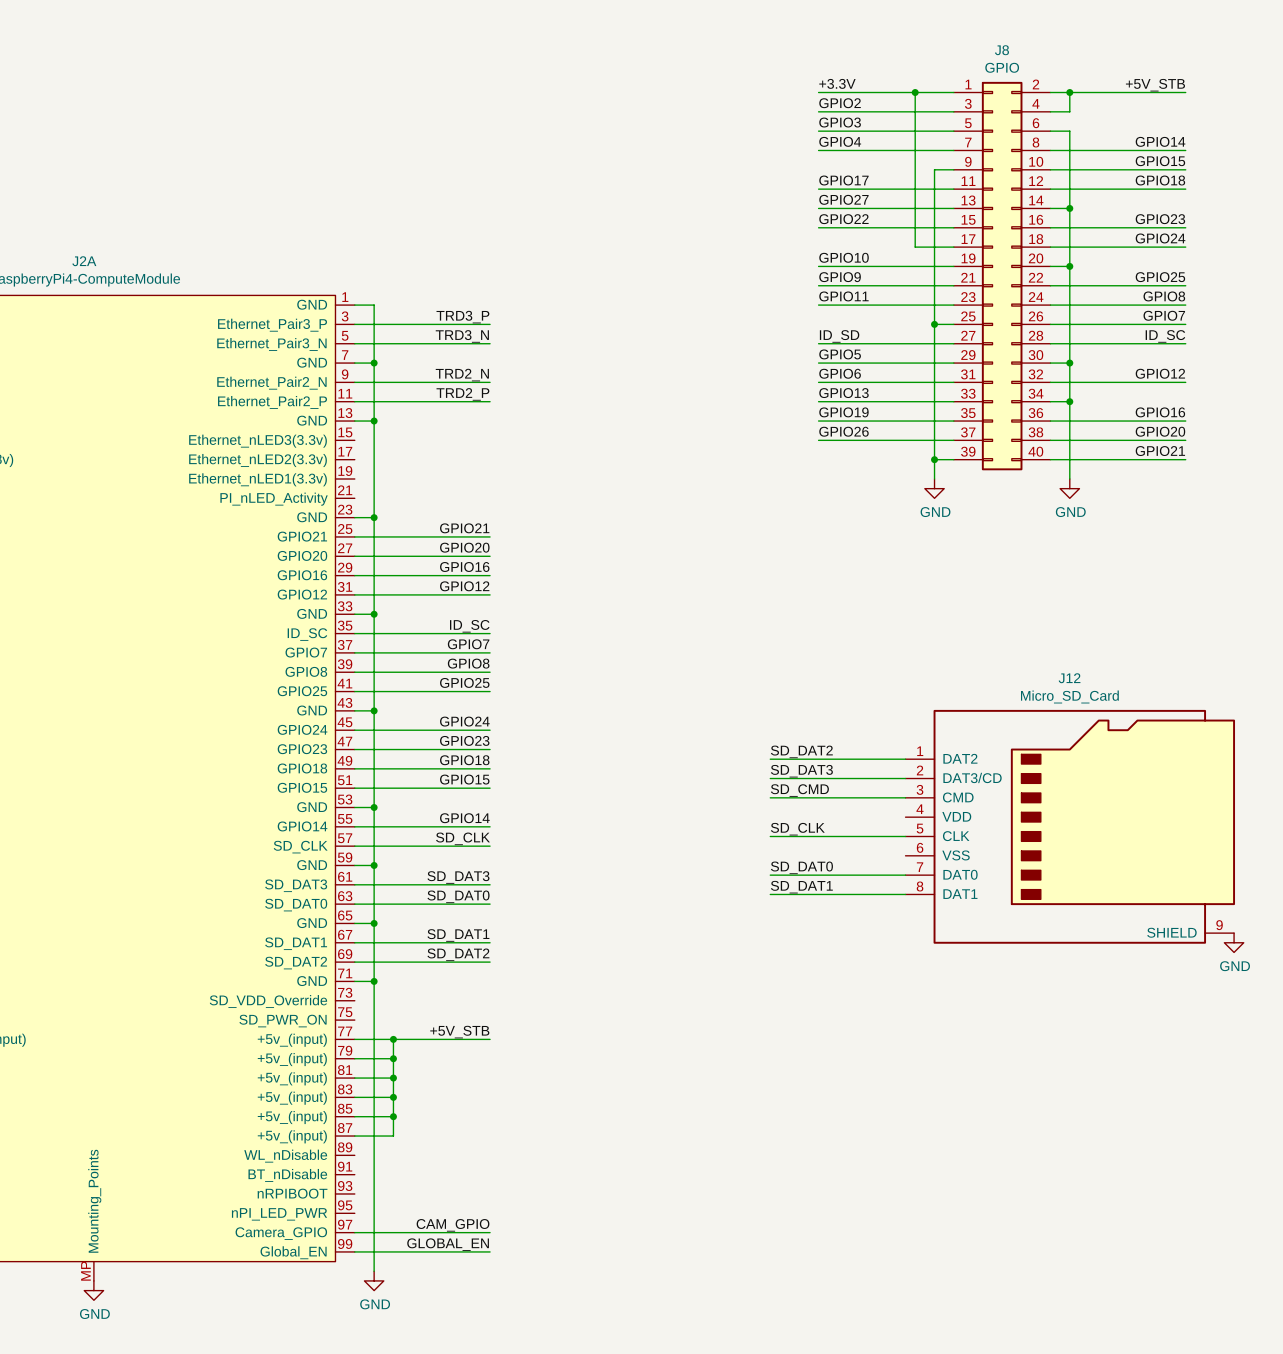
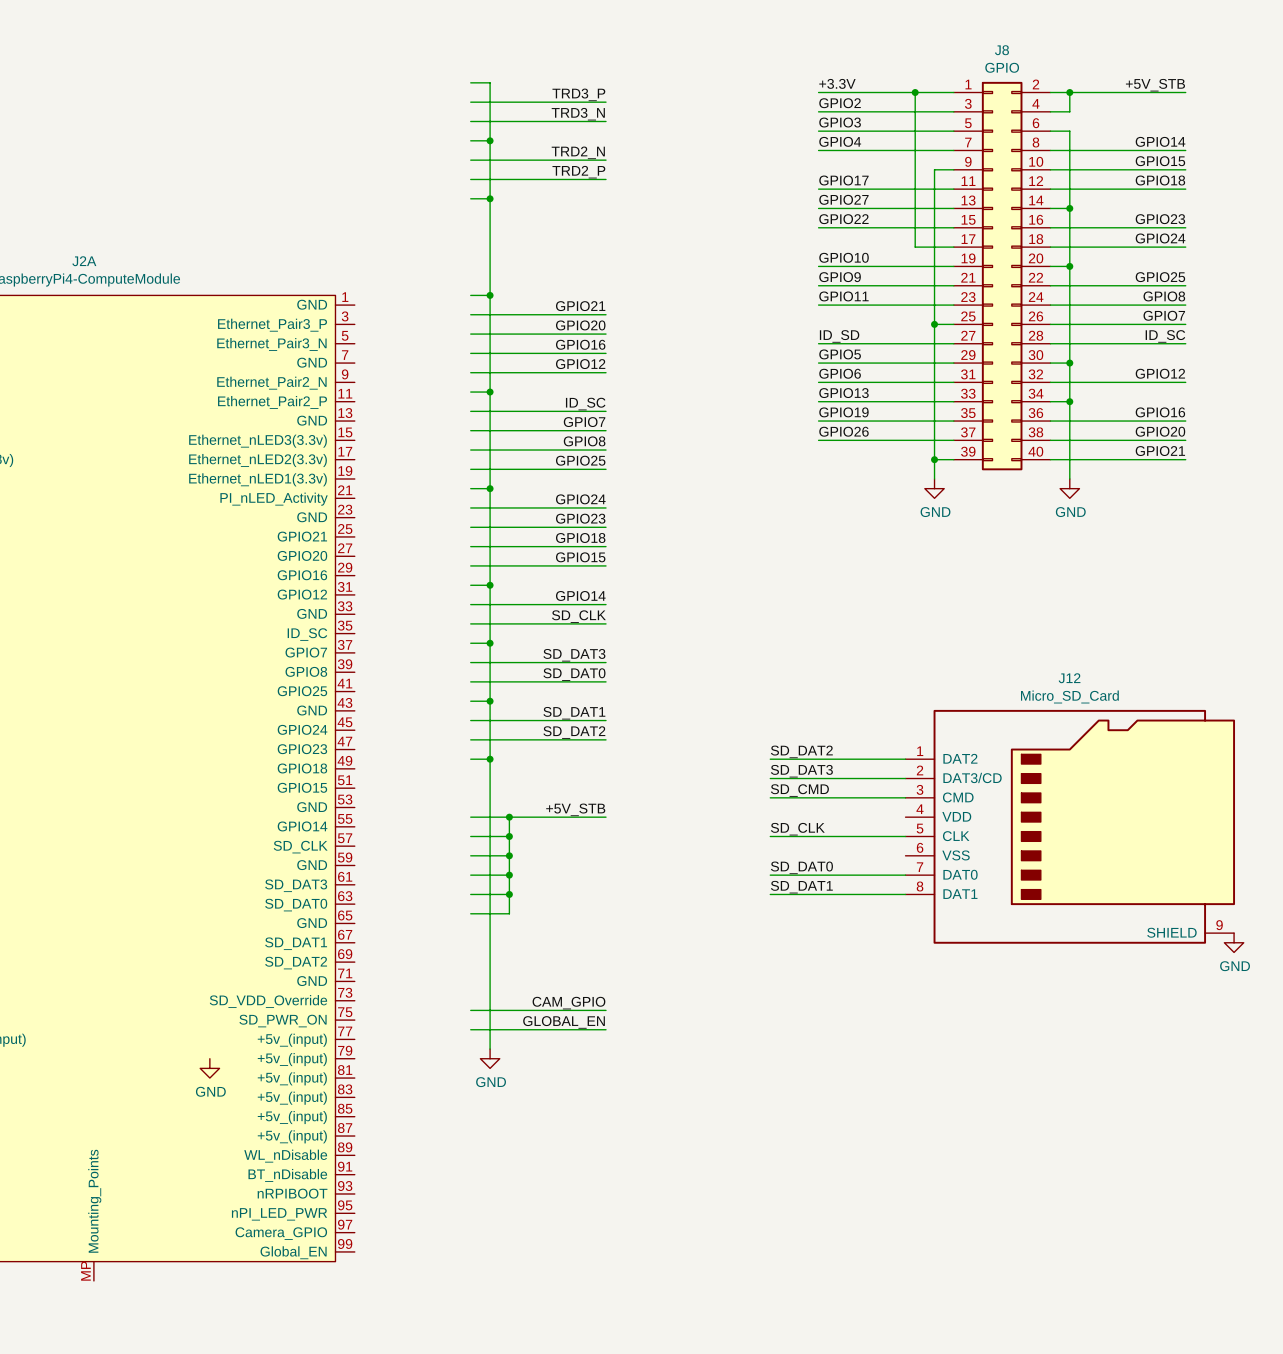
wire: none -> (470, 82) (490, 82) (490, 1049)
label: none -> TRD3_P (578, 94)
wire: none -> (470, 102) (606, 102)
label: none -> TRD3_N (578, 114)
wire: none -> (470, 121) (606, 121)
wire: none -> (470, 140) (490, 140)
junction: none -> (490, 140)
label: none -> TRD2_N (578, 152)
wire: none -> (470, 160) (606, 160)
label: none -> TRD2_P (578, 172)
wire: none -> (470, 198) (490, 198)
junction: none -> (490, 198)
junction: none -> (490, 295)
wire: (354, 305) (374, 305) (374, 1271) -> none
label: none -> GPIO21 (580, 306)
label: TRD3_P (462, 317) -> none
wire: (354, 324) (490, 324) -> (470, 179) (606, 179)
label: none -> GPIO20 (580, 325)
wire: none -> (470, 334) (606, 334)
label: TRD3_N (462, 336) -> none
wire: (354, 343) (490, 343) -> (470, 314) (606, 314)
label: none -> GPIO16 (580, 344)
wire: (354, 363) (374, 363) -> (470, 295) (490, 295)
junction: (374, 363) -> none
label: none -> GPIO12 (580, 364)
label: TRD2_N (462, 375) -> none
wire: (354, 382) (490, 382) -> (470, 353) (606, 353)
junction: none -> (490, 392)
label: TRD2_P (462, 394) -> none
wire: (354, 401) (490, 401) -> (470, 372) (606, 372)
label: none -> ID_SC (585, 404)
wire: none -> (470, 411) (606, 411)
wire: (354, 421) (374, 421) -> (470, 392) (490, 392)
junction: (374, 421) -> none
label: none -> GPIO7 (584, 422)
wire: none -> (470, 430) (606, 430)
label: none -> GPIO8 (584, 441)
wire: none -> (470, 450) (606, 450)
label: none -> GPIO25 (580, 460)
wire: none -> (470, 469) (606, 469)
junction: none -> (490, 488)
label: none -> GPIO24 (580, 499)
wire: (354, 517) (374, 517) -> (470, 488) (490, 488)
junction: (374, 517) -> none
label: none -> GPIO23 (580, 518)
label: GPIO21 (464, 528) -> none
wire: (354, 536) (490, 536) -> (470, 507) (606, 507)
label: none -> GPIO18 (580, 538)
label: GPIO20 (464, 547) -> none
wire: (354, 556) (490, 556) -> (470, 527) (606, 527)
label: none -> GPIO15 (580, 557)
label: GPIO16 (464, 566) -> none
wire: (354, 575) (490, 575) -> (470, 546) (606, 546)
junction: none -> (490, 585)
label: GPIO12 (464, 586) -> none
wire: (354, 594) (490, 594) -> (470, 565) (606, 565)
label: none -> GPIO14 (580, 595)
wire: (354, 614) (374, 614) -> (470, 585) (490, 585)
junction: (374, 614) -> none
label: none -> SD_CLK (578, 616)
label: ID_SC (469, 626) -> none
wire: (354, 633) (490, 633) -> (470, 604) (606, 604)
wire: none -> (470, 643) (490, 643)
junction: none -> (490, 643)
label: GPIO7 (468, 644) -> none
wire: (354, 652) (490, 652) -> (470, 623) (606, 623)
label: none -> SD_DAT3 (574, 655)
label: GPIO8 (468, 663) -> none
wire: (354, 672) (490, 672) -> none
label: none -> SD_DAT0 (574, 674)
label: GPIO25 (464, 682) -> none
wire: (354, 691) (490, 691) -> (470, 662) (606, 662)
junction: none -> (490, 701)
wire: (354, 710) (374, 710) -> (470, 701) (490, 701)
junction: (374, 710) -> none
label: none -> SD_DAT1 (574, 713)
label: GPIO24 (464, 721) -> none
wire: (354, 730) (490, 730) -> none
label: none -> SD_DAT2 (574, 732)
label: GPIO23 (464, 740) -> none
wire: (354, 749) (490, 749) -> (470, 720) (606, 720)
junction: none -> (490, 759)
label: GPIO18 (464, 760) -> none
wire: (354, 768) (490, 768) -> (470, 739) (606, 739)
label: GPIO15 (464, 779) -> none
wire: (354, 788) (490, 788) -> none
wire: (354, 807) (374, 807) -> (470, 759) (490, 759)
junction: (374, 807) -> none
label: none -> +5V_STB (575, 809)
wire: none -> (509, 817) (509, 913) (470, 913)
junction: none -> (509, 817)
label: GPIO14 (464, 818) -> none
wire: (354, 826) (490, 826) -> (470, 681) (606, 681)
wire: none -> (470, 836) (509, 836)
junction: none -> (509, 836)
label: SD_CLK (462, 838) -> none
wire: (354, 846) (490, 846) -> (470, 817) (606, 817)
wire: none -> (470, 855) (509, 855)
junction: none -> (509, 855)
wire: (354, 865) (374, 865) -> none
junction: (374, 865) -> none
wire: none -> (470, 875) (509, 875)
junction: none -> (509, 875)
label: SD_DAT3 (458, 877) -> none
wire: (354, 884) (490, 884) -> none
wire: none -> (470, 894) (509, 894)
junction: none -> (509, 894)
label: SD_DAT0 (458, 896) -> none
wire: (354, 904) (490, 904) -> none
wire: (354, 923) (374, 923) -> none
junction: (374, 923) -> none
label: SD_DAT1 (458, 935) -> none
wire: (354, 942) (490, 942) -> none
label: SD_DAT2 (458, 954) -> none
wire: (354, 962) (490, 962) -> (470, 1029) (606, 1029)
wire: (354, 981) (374, 981) -> none
junction: (374, 981) -> none
label: none -> CAM_GPIO (568, 1003)
label: none -> GLOBAL_EN (564, 1022)
label: +5V_STB (459, 1032) -> none
wire: (354, 1039) (490, 1039) -> (470, 1010) (606, 1010)
wire: (393, 1039) (393, 1136) (354, 1136) -> none
junction: (393, 1039) -> none
wire: (354, 1058) (393, 1058) -> none
junction: (393, 1058) -> none
power symbol: none -> GND (490, 1058)
power symbol: none -> GND (209, 1068)
wire: (354, 1078) (393, 1078) -> none
junction: (393, 1078) -> none
wire: (354, 1097) (393, 1097) -> none
junction: (393, 1097) -> none
wire: (354, 1116) (393, 1116) -> none
junction: (393, 1116) -> none
label: CAM_GPIO (453, 1225) -> none
wire: (354, 1232) (490, 1232) -> none
label: GLOBAL_EN (448, 1244) -> none
wire: (354, 1251) (490, 1251) -> none
power symbol: GND (374, 1280) -> none
power symbol: GND (93, 1290) -> none

